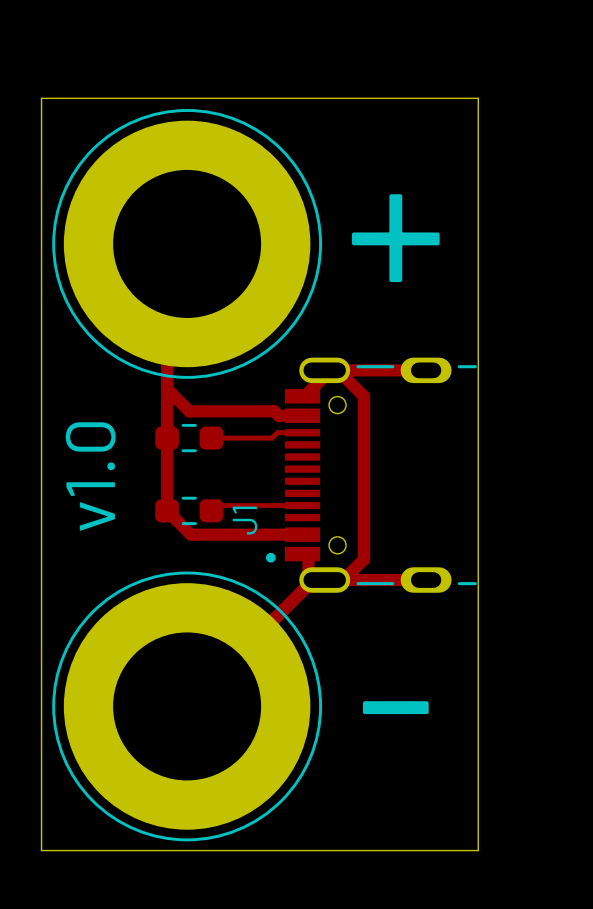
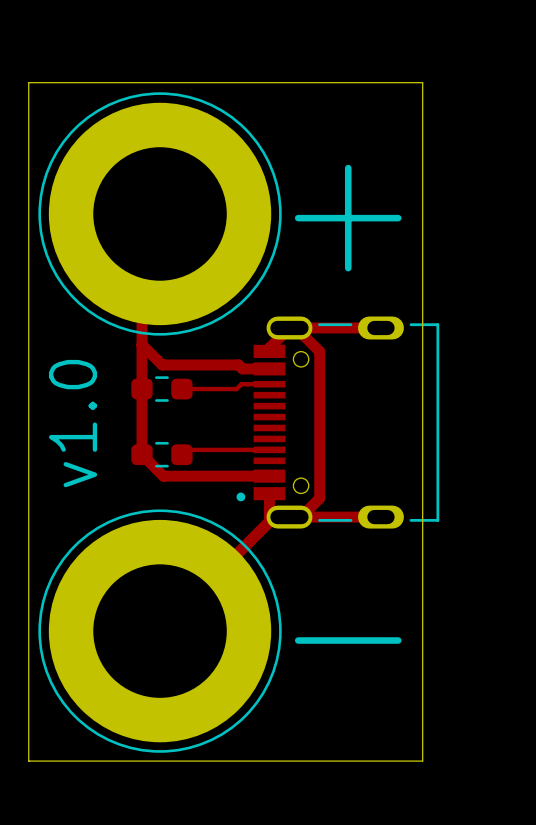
J1: (371, 475) -> none
part: none -> (337, 422)

